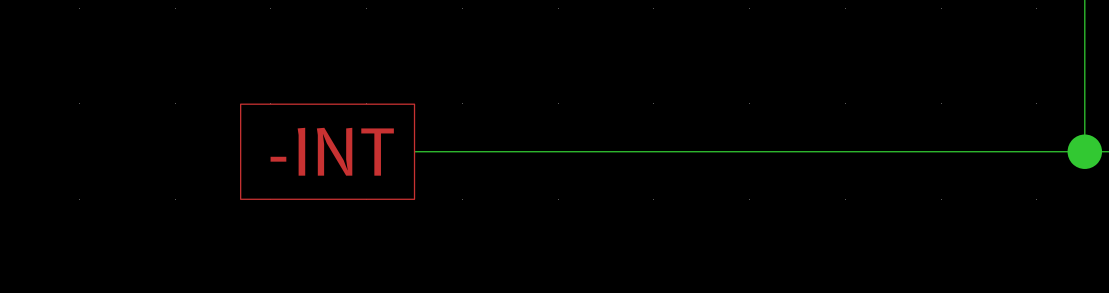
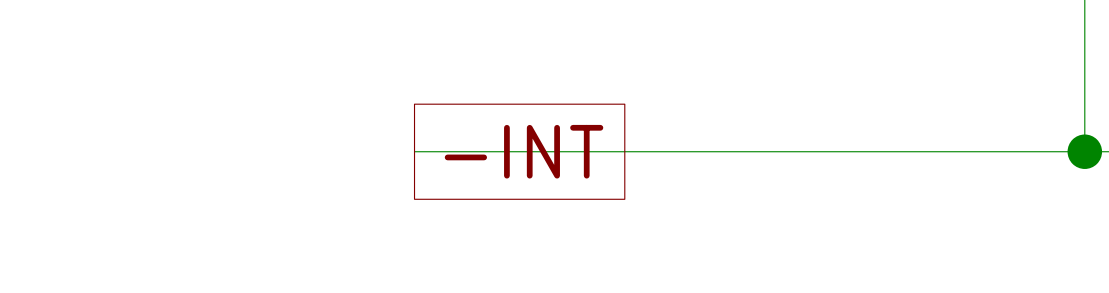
global label rotation: 0° (332, 151) -> 180° (524, 151)
global label position: -INT (332, 151) -> -INT (524, 151)

